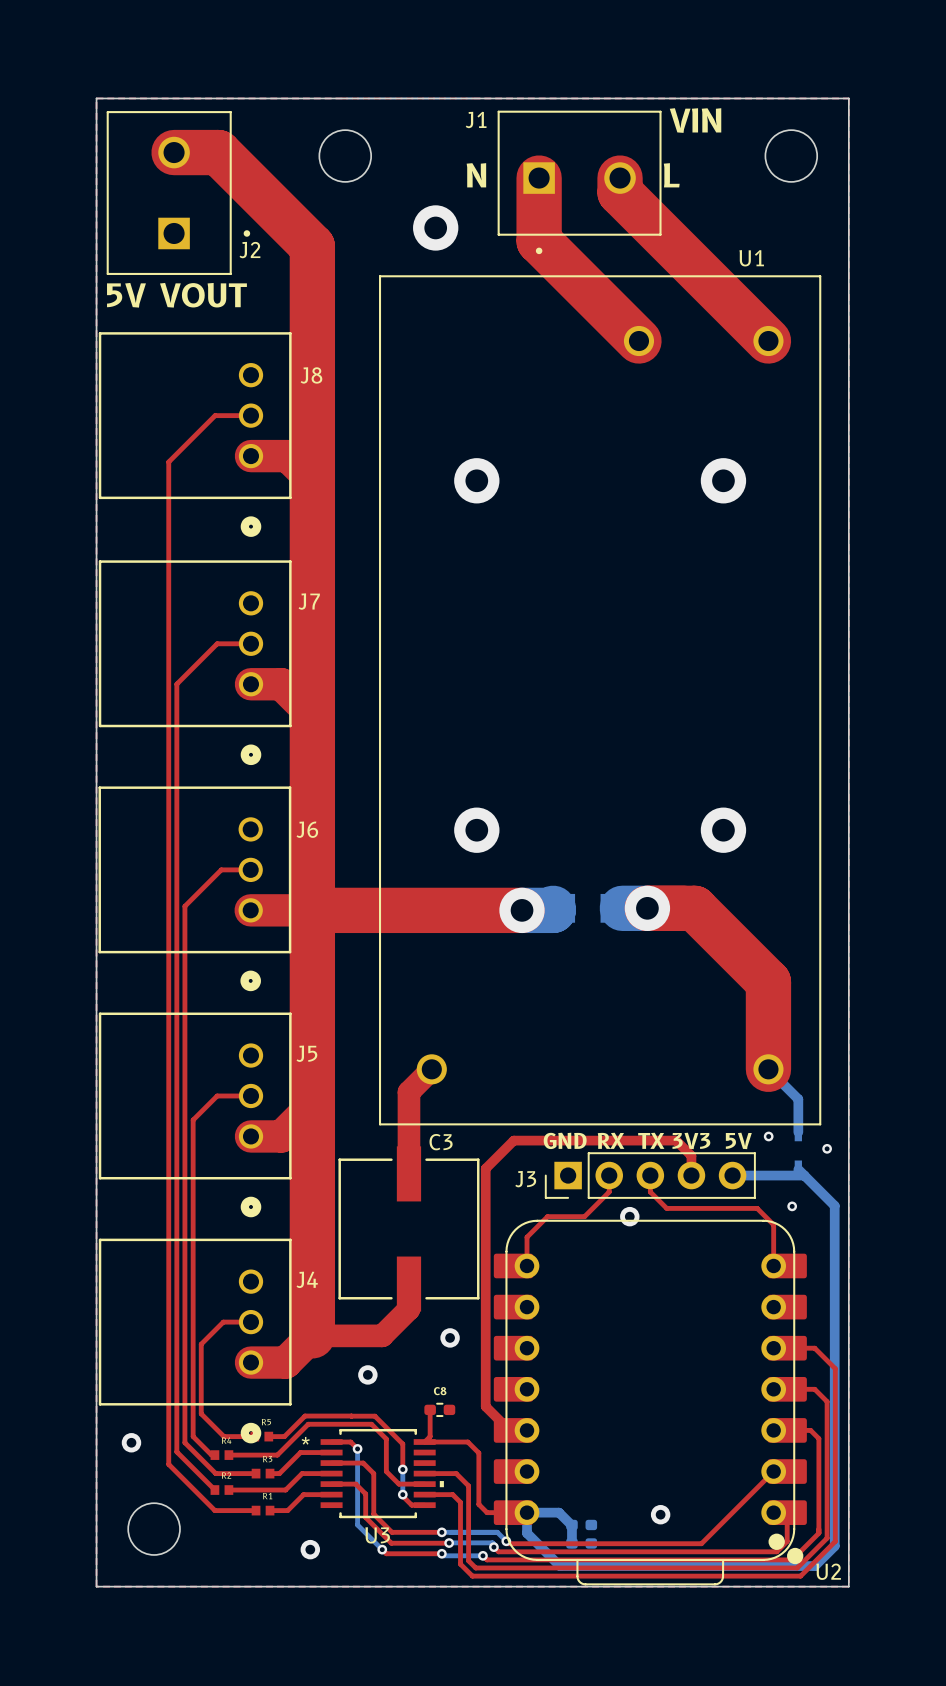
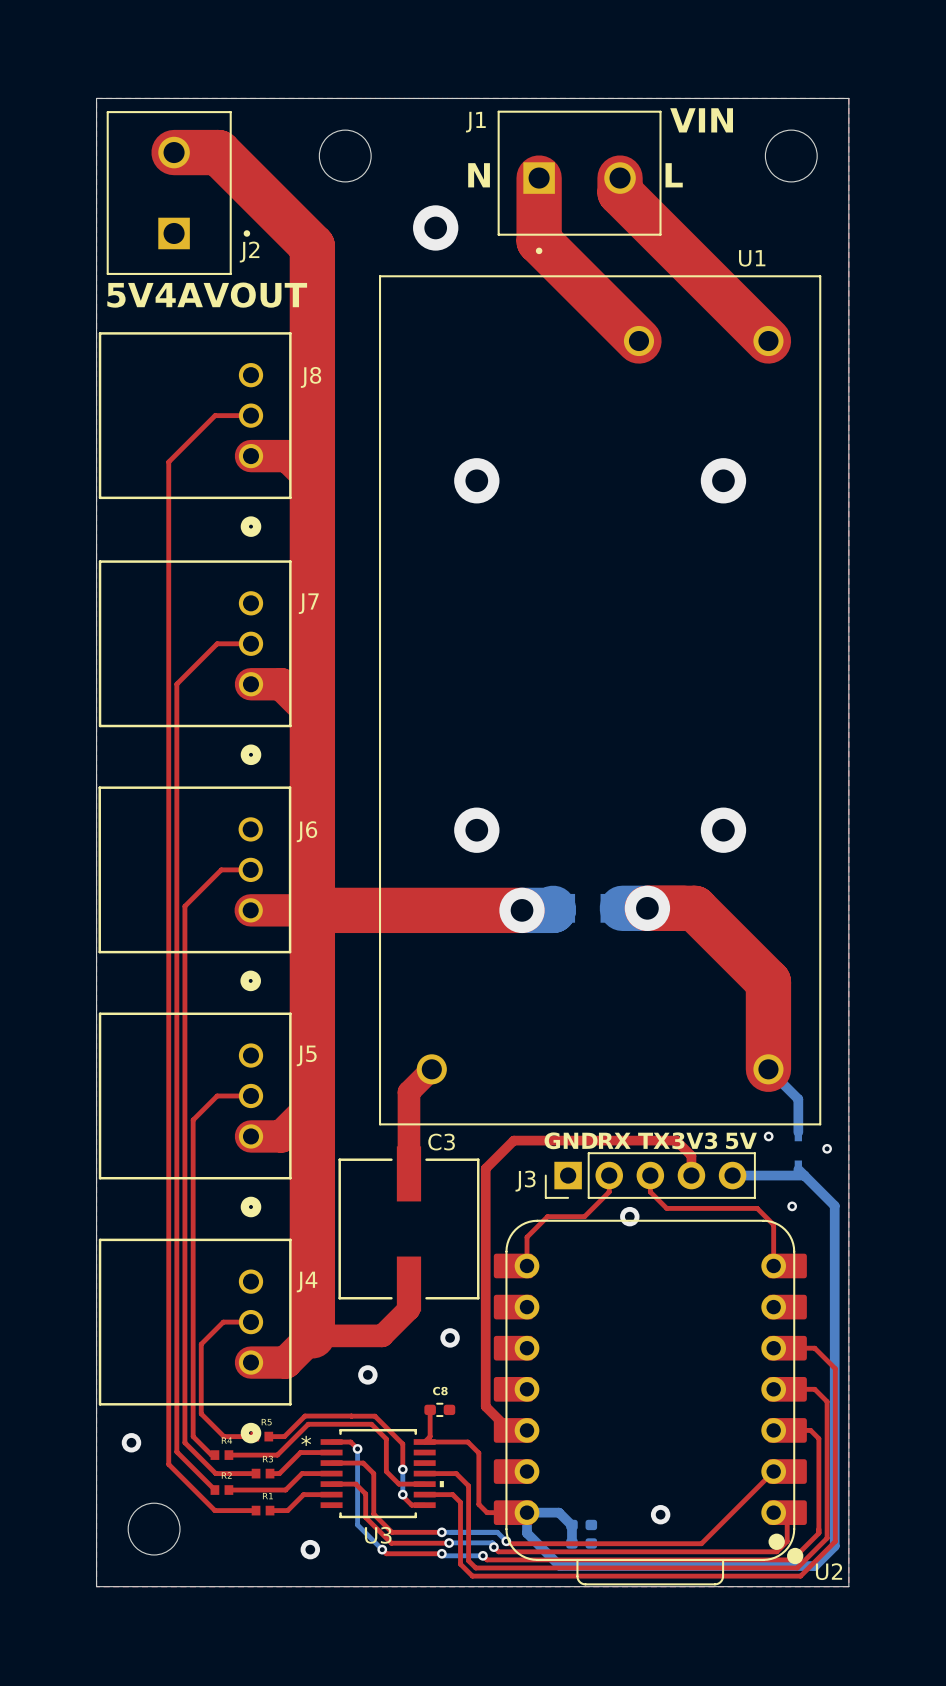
text: VOUT (203, 295) -> 4A (179, 295)
text: none -> VOUT (255, 295)

